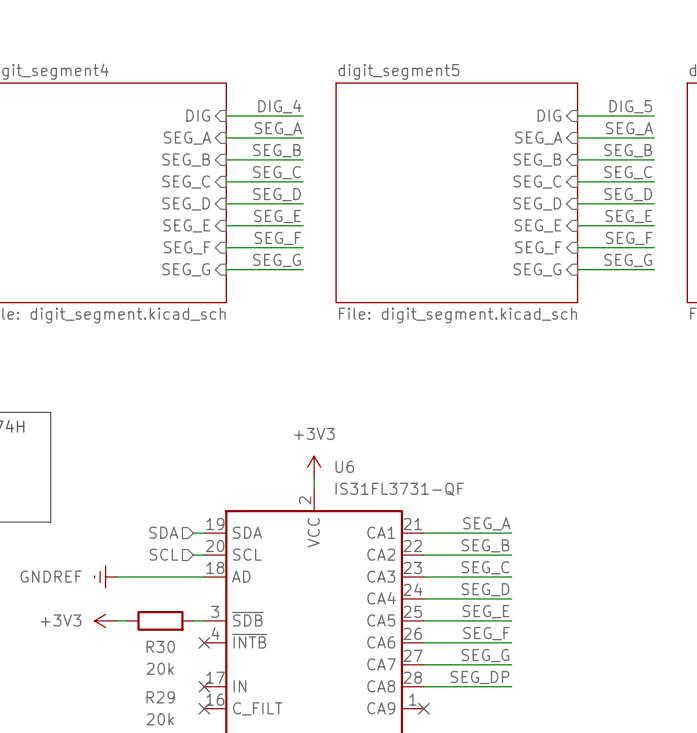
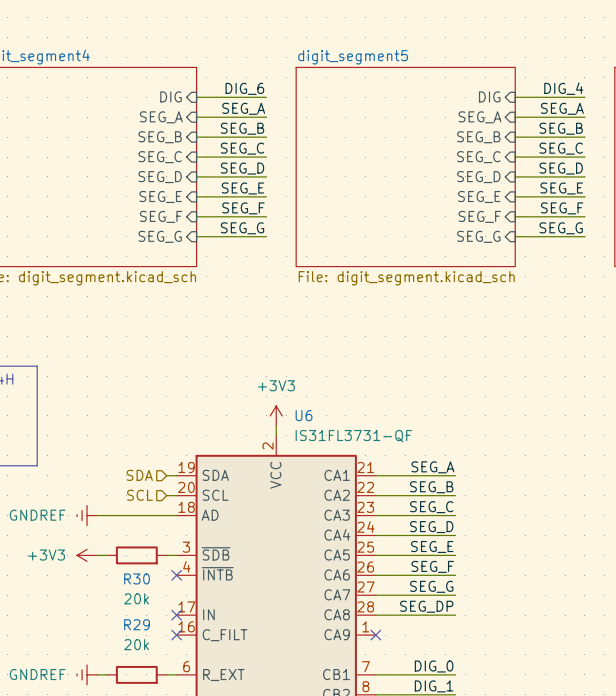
label: DIG_4 (279, 106) -> DIG_6 (244, 88)
label: DIG_5 (630, 106) -> DIG_4 (563, 88)

